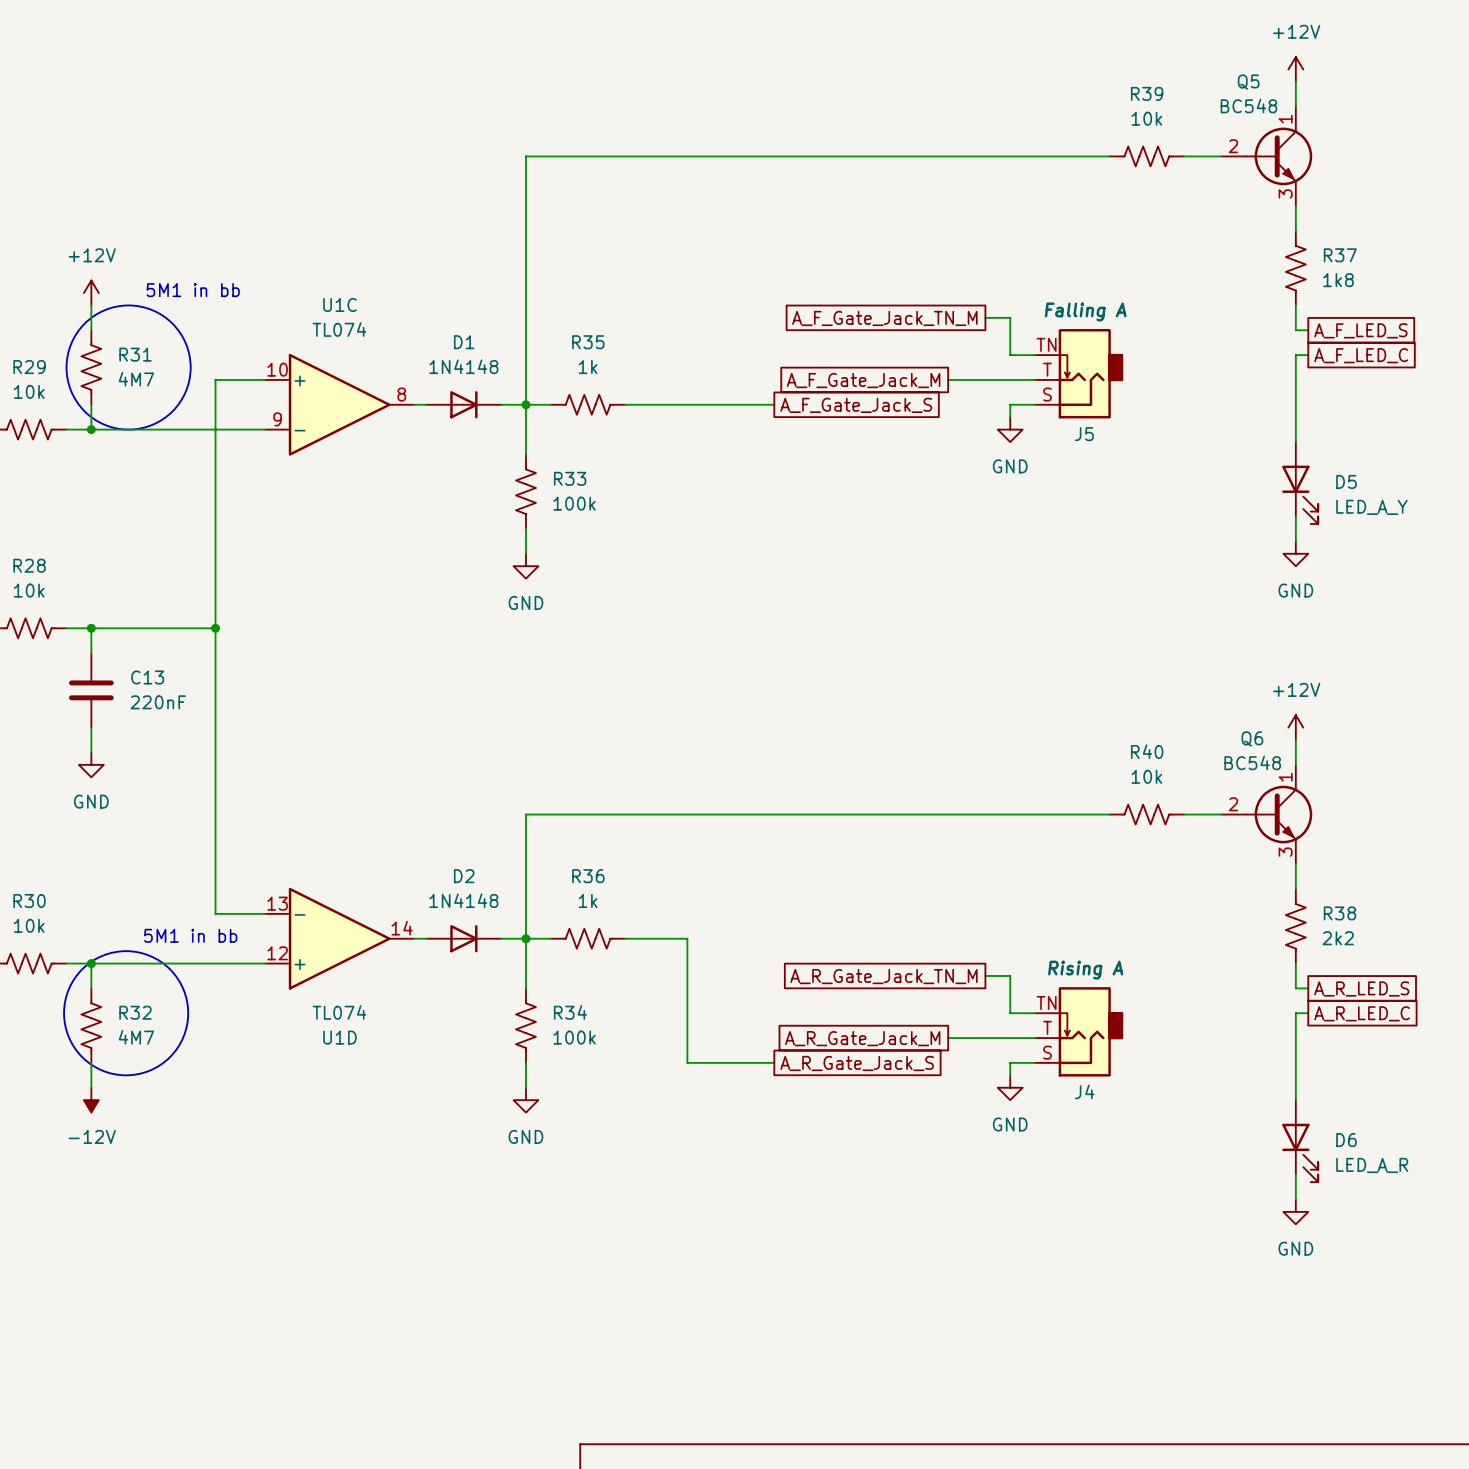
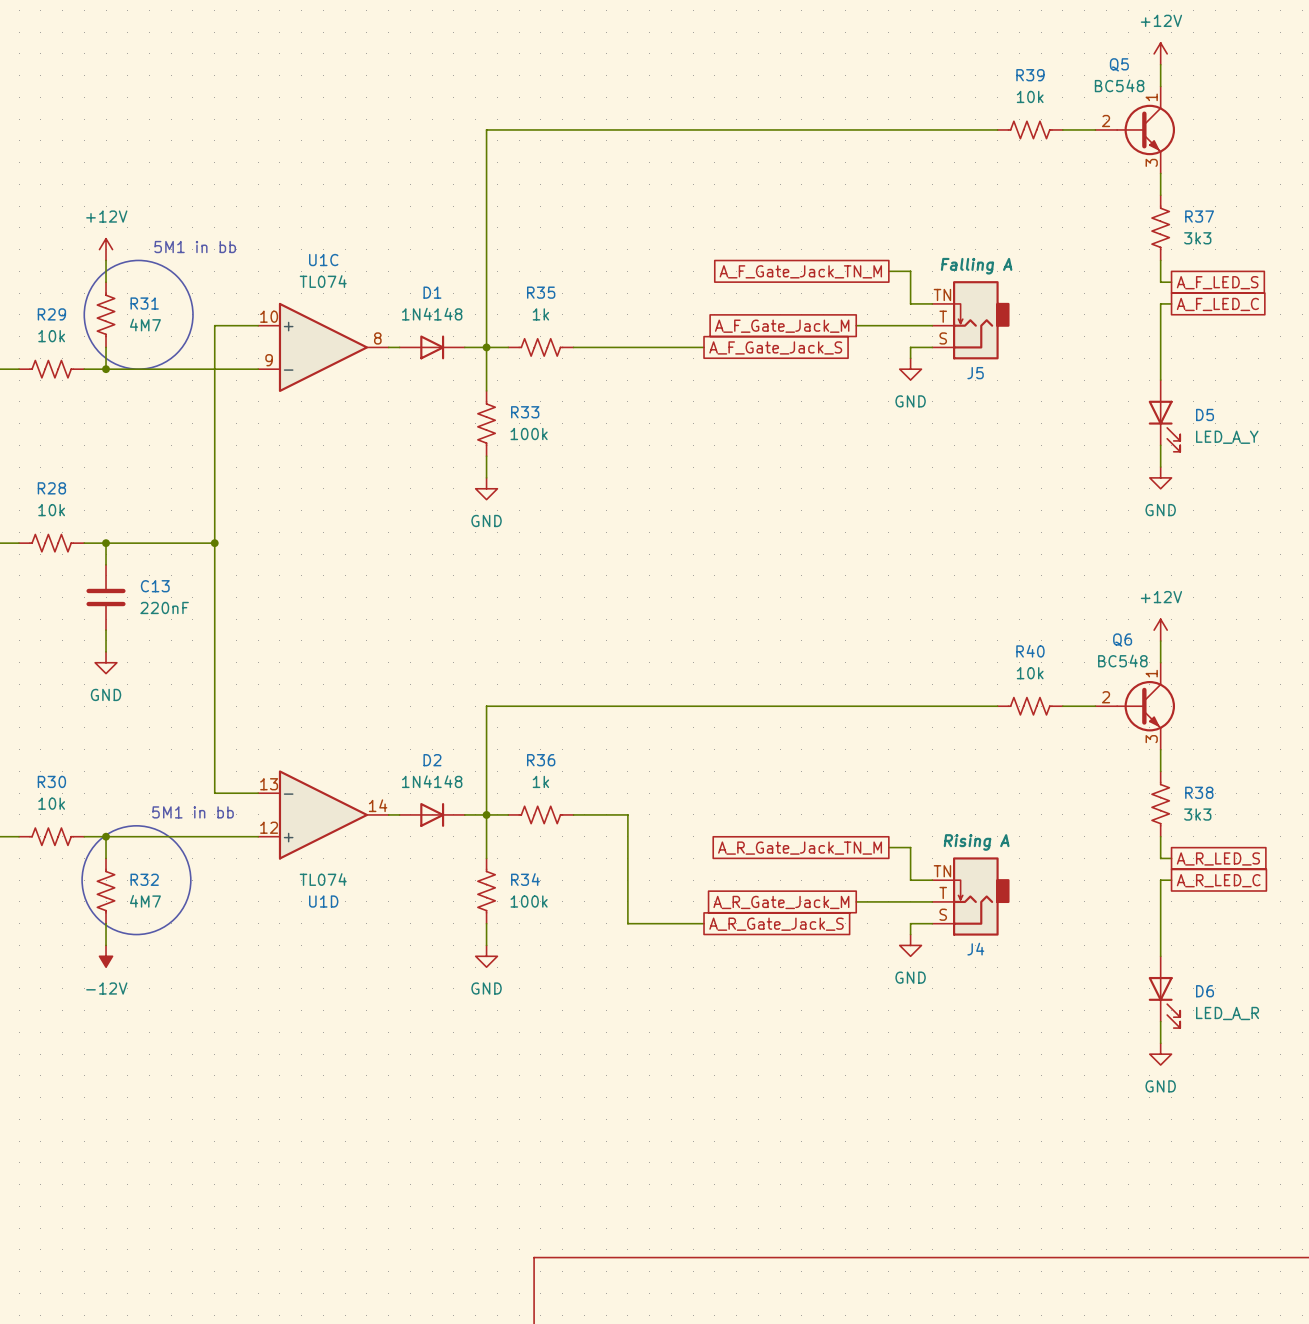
R37 value: 1k8 (1338, 280) -> 3k3 (1197, 238)
R38 value: 2k2 (1338, 938) -> 3k3 (1197, 814)

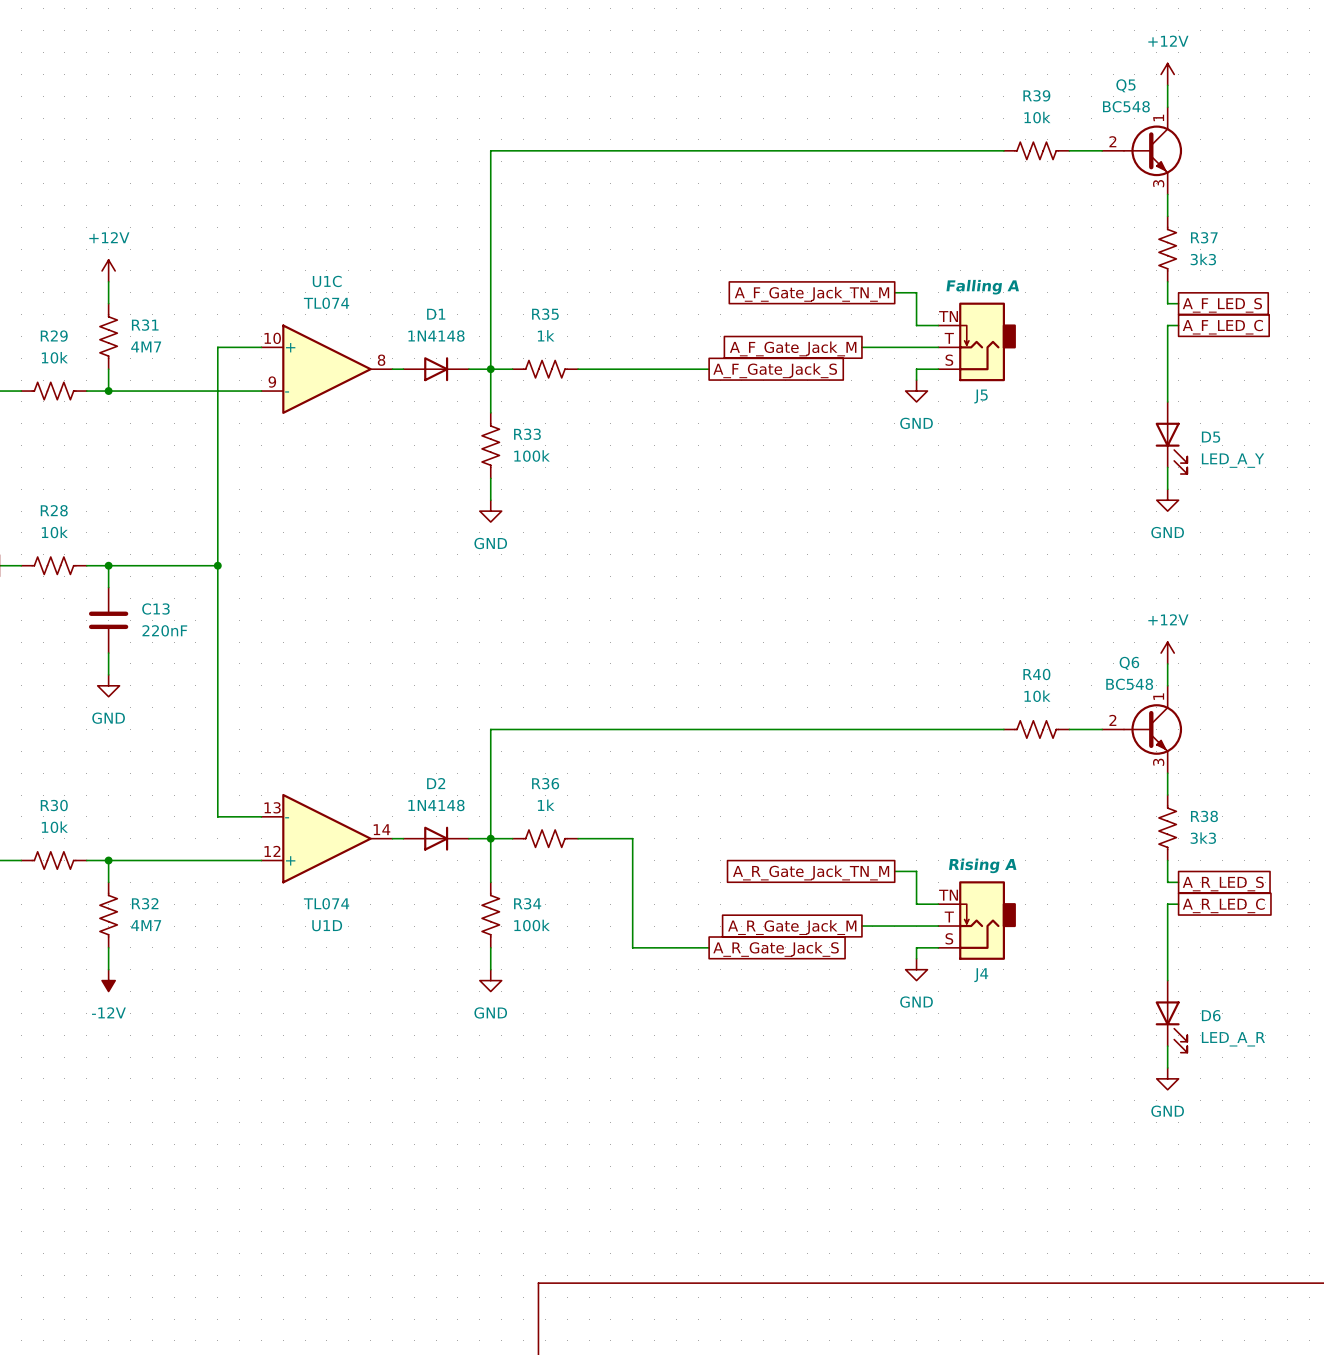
text: 5M1 in bb (195, 247) -> none
drawing: [84, 260, 193, 370] -> none
text: 5M1 in bb (192, 812) -> none
drawing: [82, 825, 191, 935] -> none

